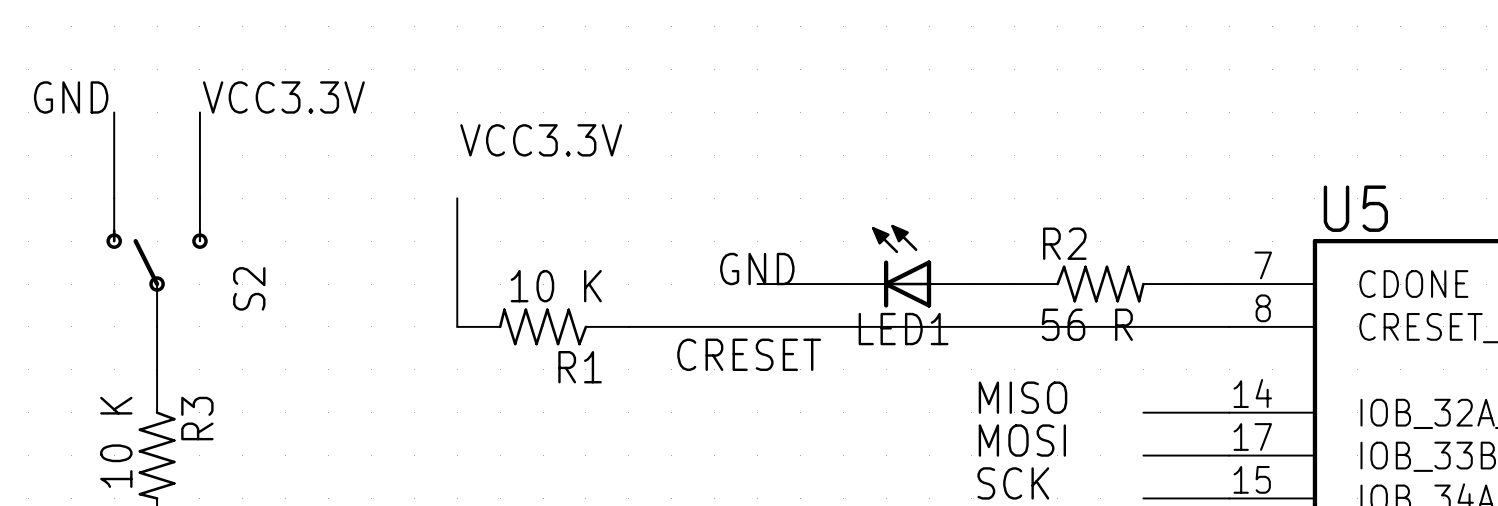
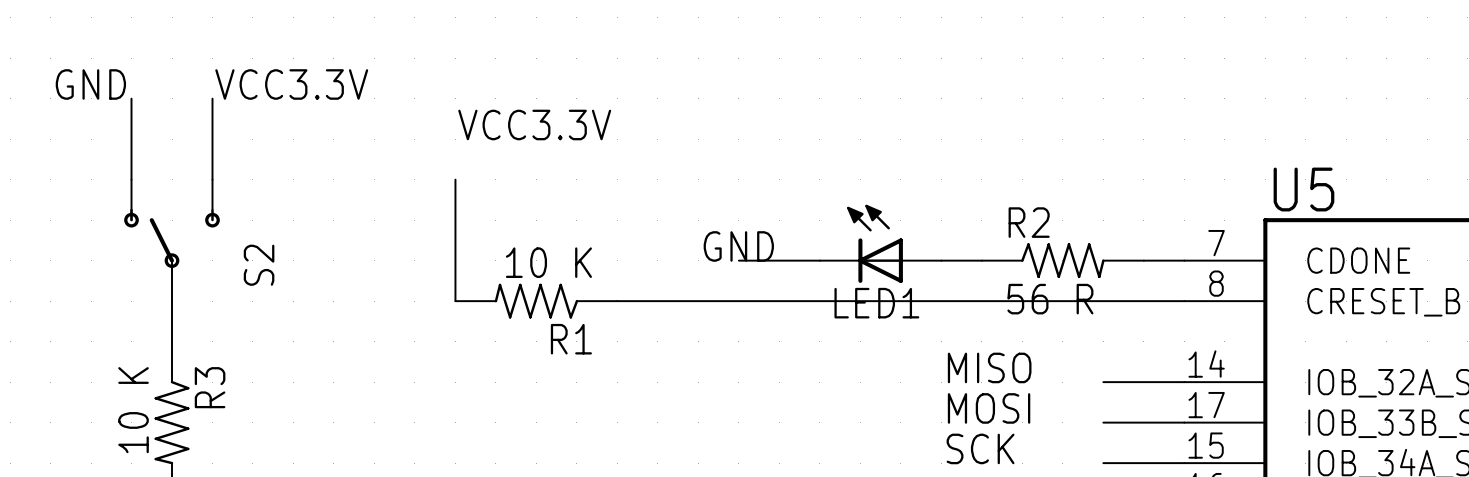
label: CRESET (749, 354) -> none

